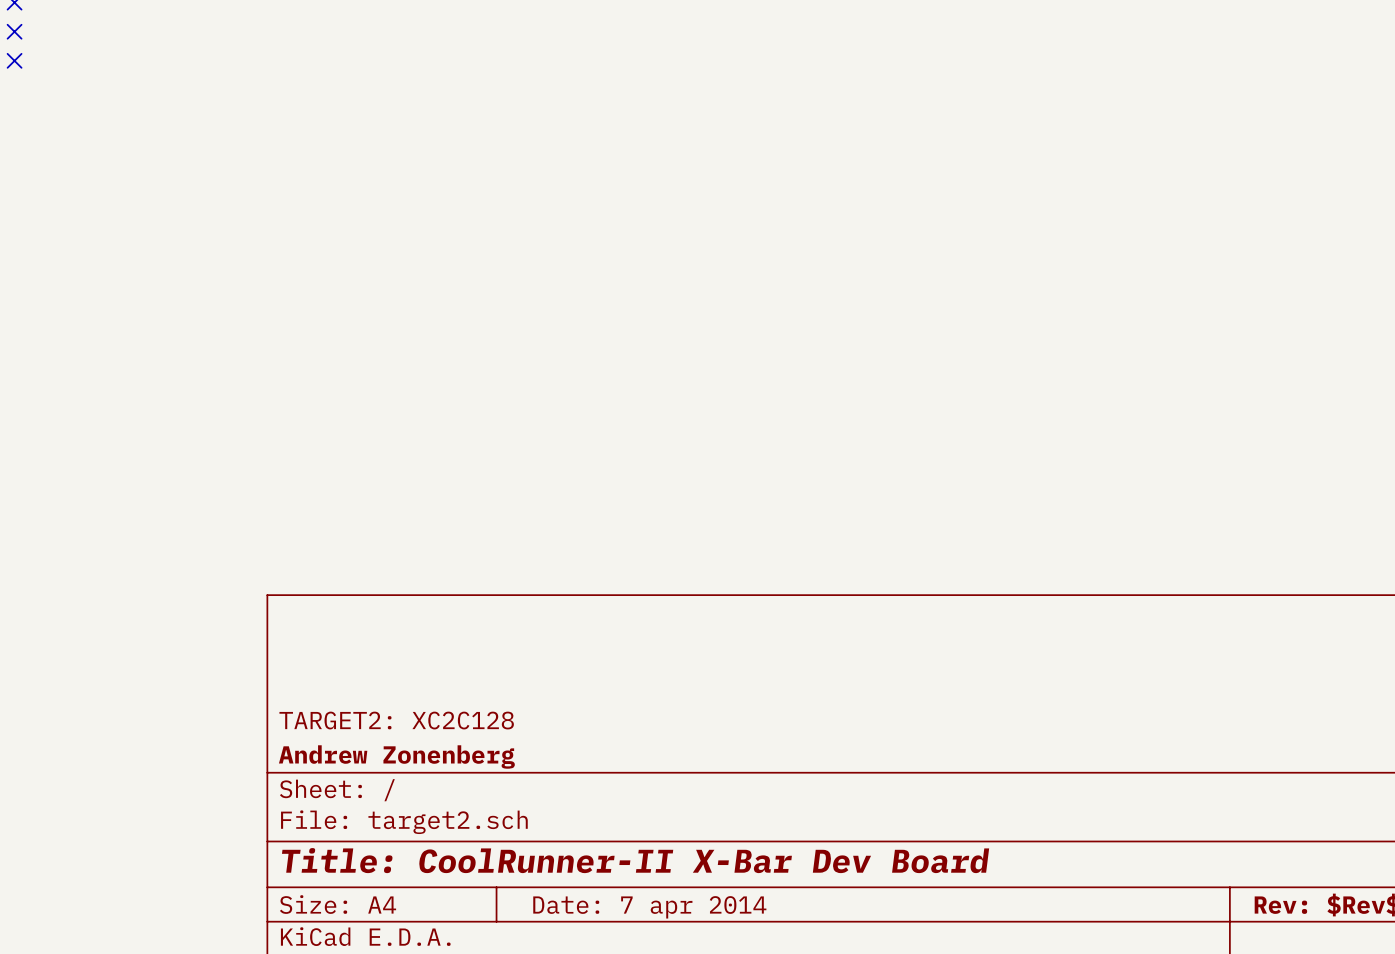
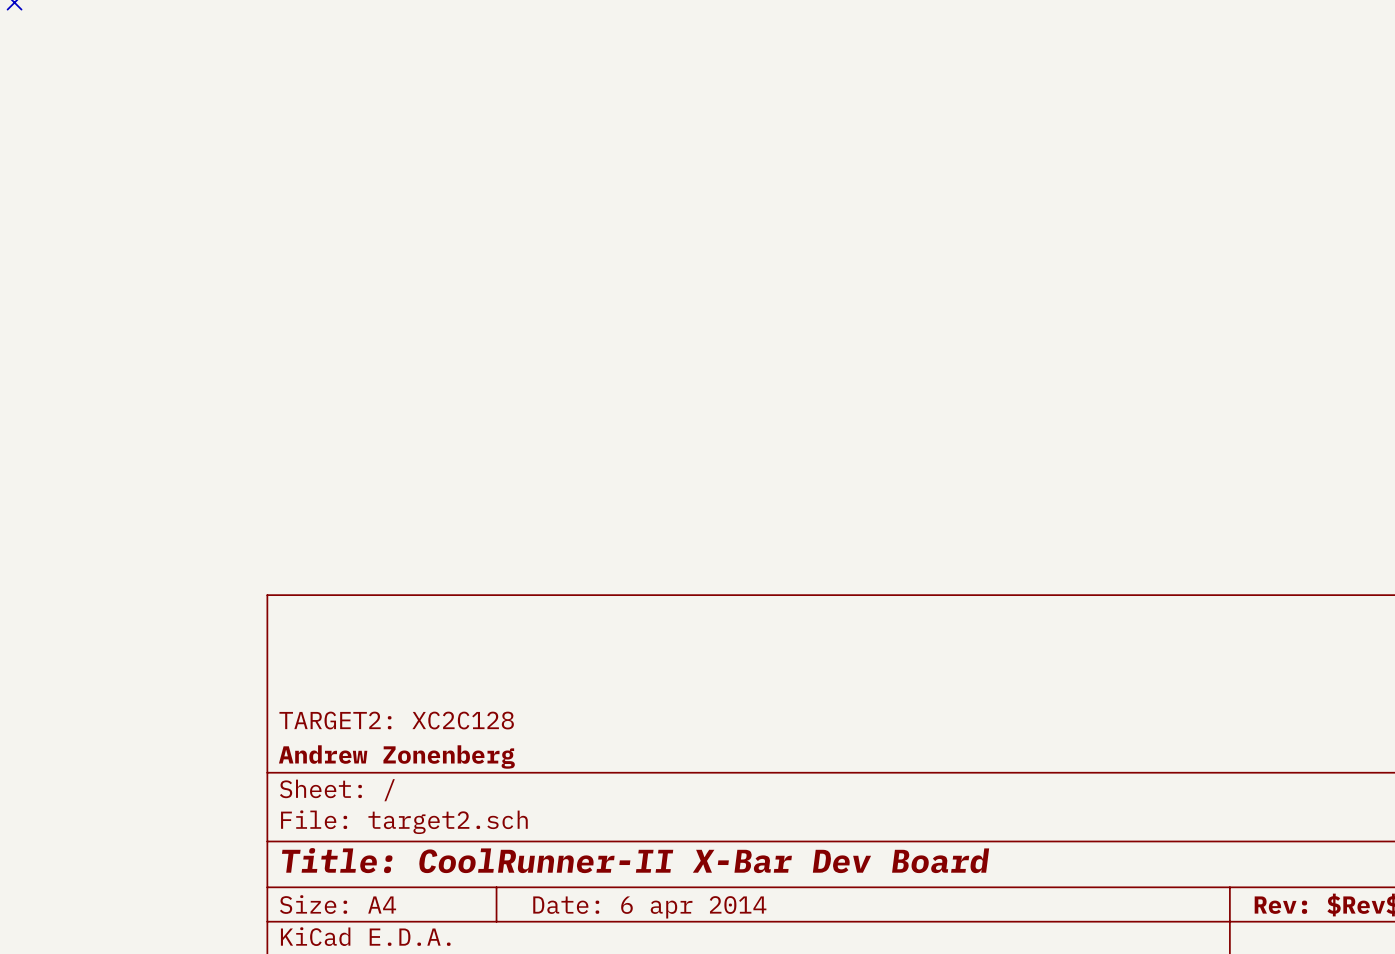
no-connect mark: (14, 31) -> none
no-connect mark: (14, 60) -> none
title block: Date: 7 apr 2014 (649, 907) -> Date: 6 apr 2014 (649, 907)

